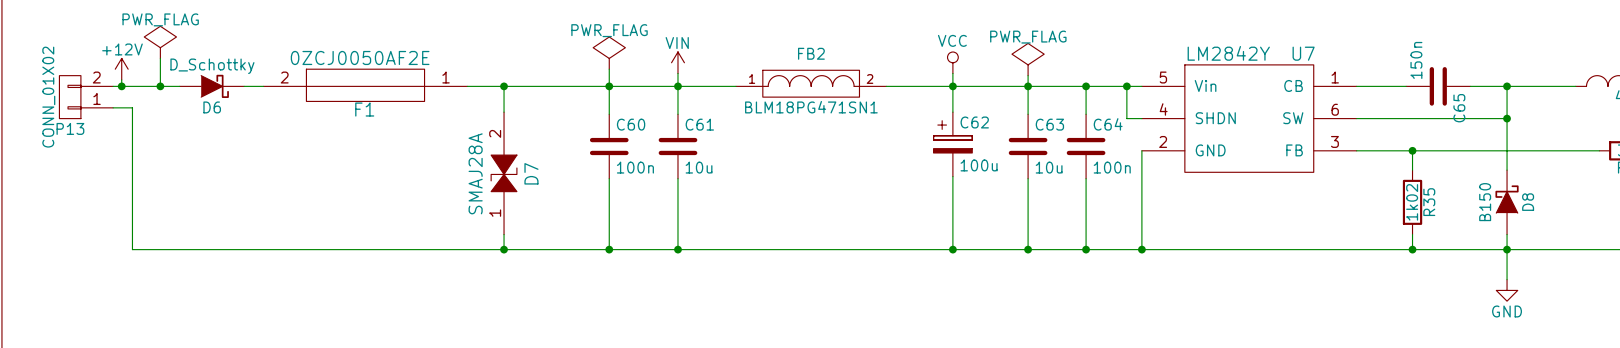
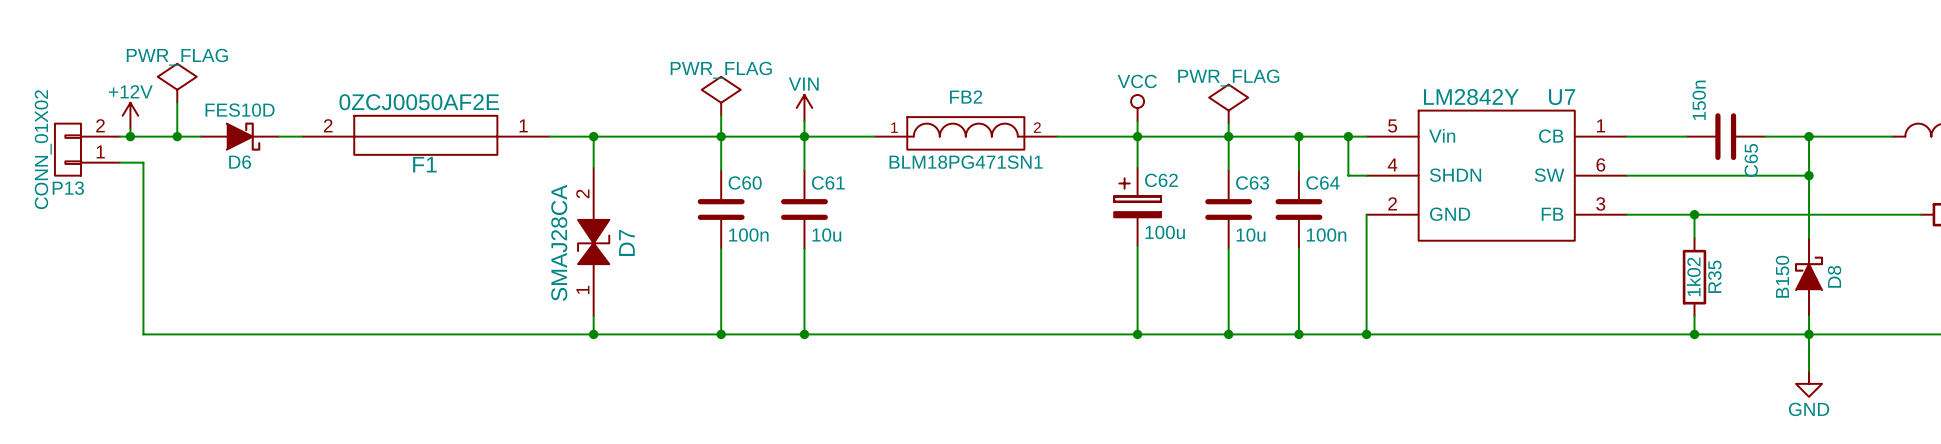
D6 value: D_Schottky (212, 66) -> FES10D (240, 110)
D7 value: SMAJ28A (475, 173) -> SMAJ28CA (559, 242)

